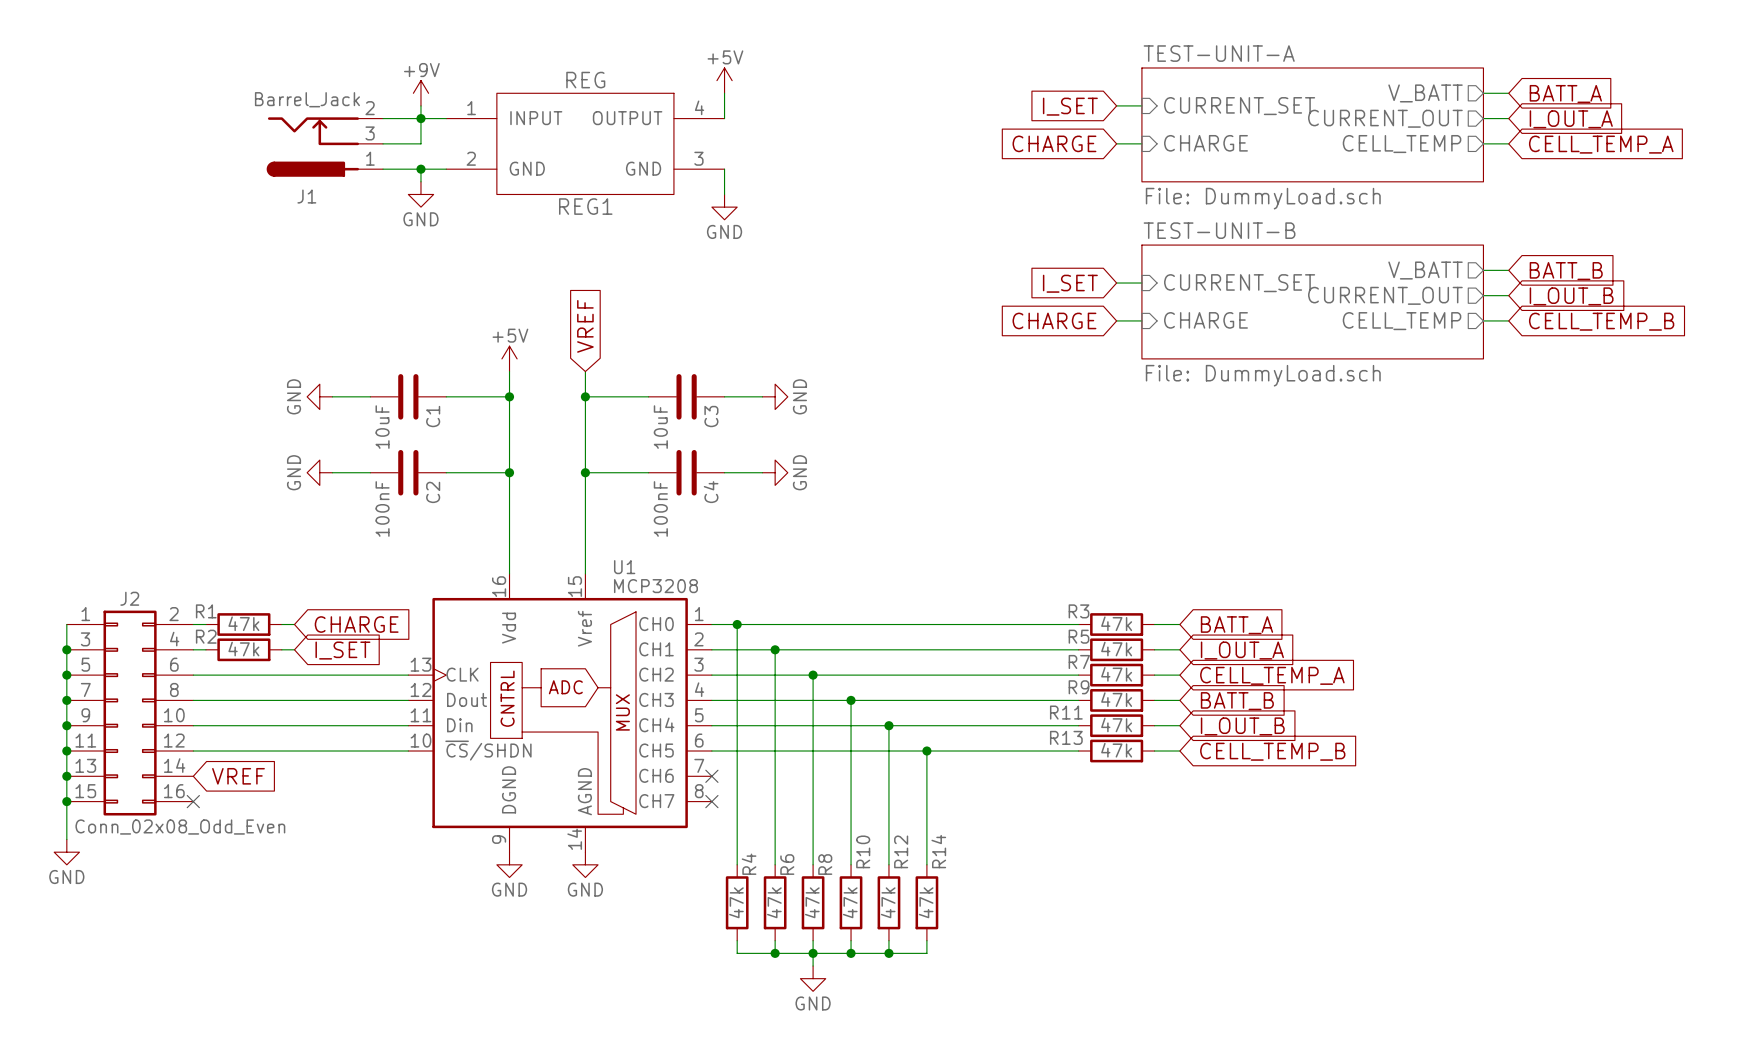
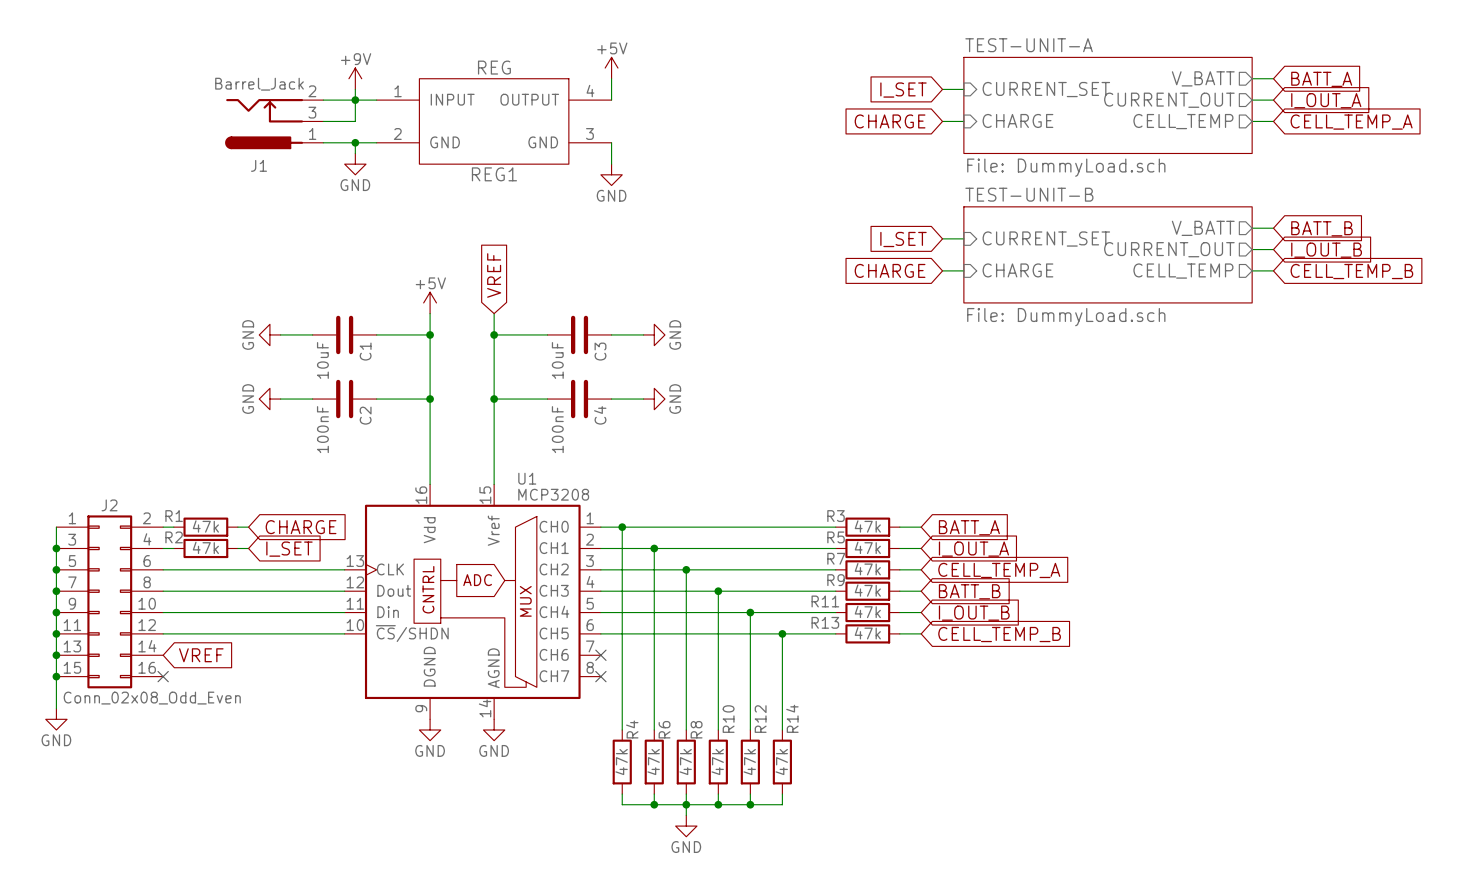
wire: (990, 624) (1066, 624) -> none
R3 position: (1116, 624) -> (867, 527)
wire: (1154, 624) (1179, 624) -> none
global label position: BATT_A (1236, 625) -> BATT_A (969, 527)
wire: (990, 649) (1066, 649) -> none
R5 position: (1116, 649) -> (867, 548)
wire: (1154, 649) (1179, 649) -> none
global label position: I_OUT_A (1242, 650) -> I_OUT_A (973, 549)
wire: (990, 675) (1066, 675) -> none
R7 position: (1116, 675) -> (867, 569)
wire: (1154, 675) (1179, 675) -> none
global label position: CELL_TEMP_A (1272, 675) -> CELL_TEMP_A (999, 570)
wire: (990, 700) (1066, 700) -> none
R9 position: (1116, 700) -> (867, 591)
wire: (1154, 700) (1179, 700) -> none
global label position: BATT_B (1237, 701) -> BATT_B (969, 591)
wire: (990, 725) (1066, 725) -> none
R11 position: (1116, 725) -> (867, 612)
wire: (1154, 725) (1179, 725) -> none
global label position: I_OUT_B (1242, 726) -> I_OUT_B (974, 613)
wire: (990, 751) (1066, 751) -> none
R13 position: (1116, 751) -> (867, 633)
wire: (1154, 751) (1179, 751) -> none
global label position: CELL_TEMP_B (1272, 751) -> CELL_TEMP_B (999, 634)

